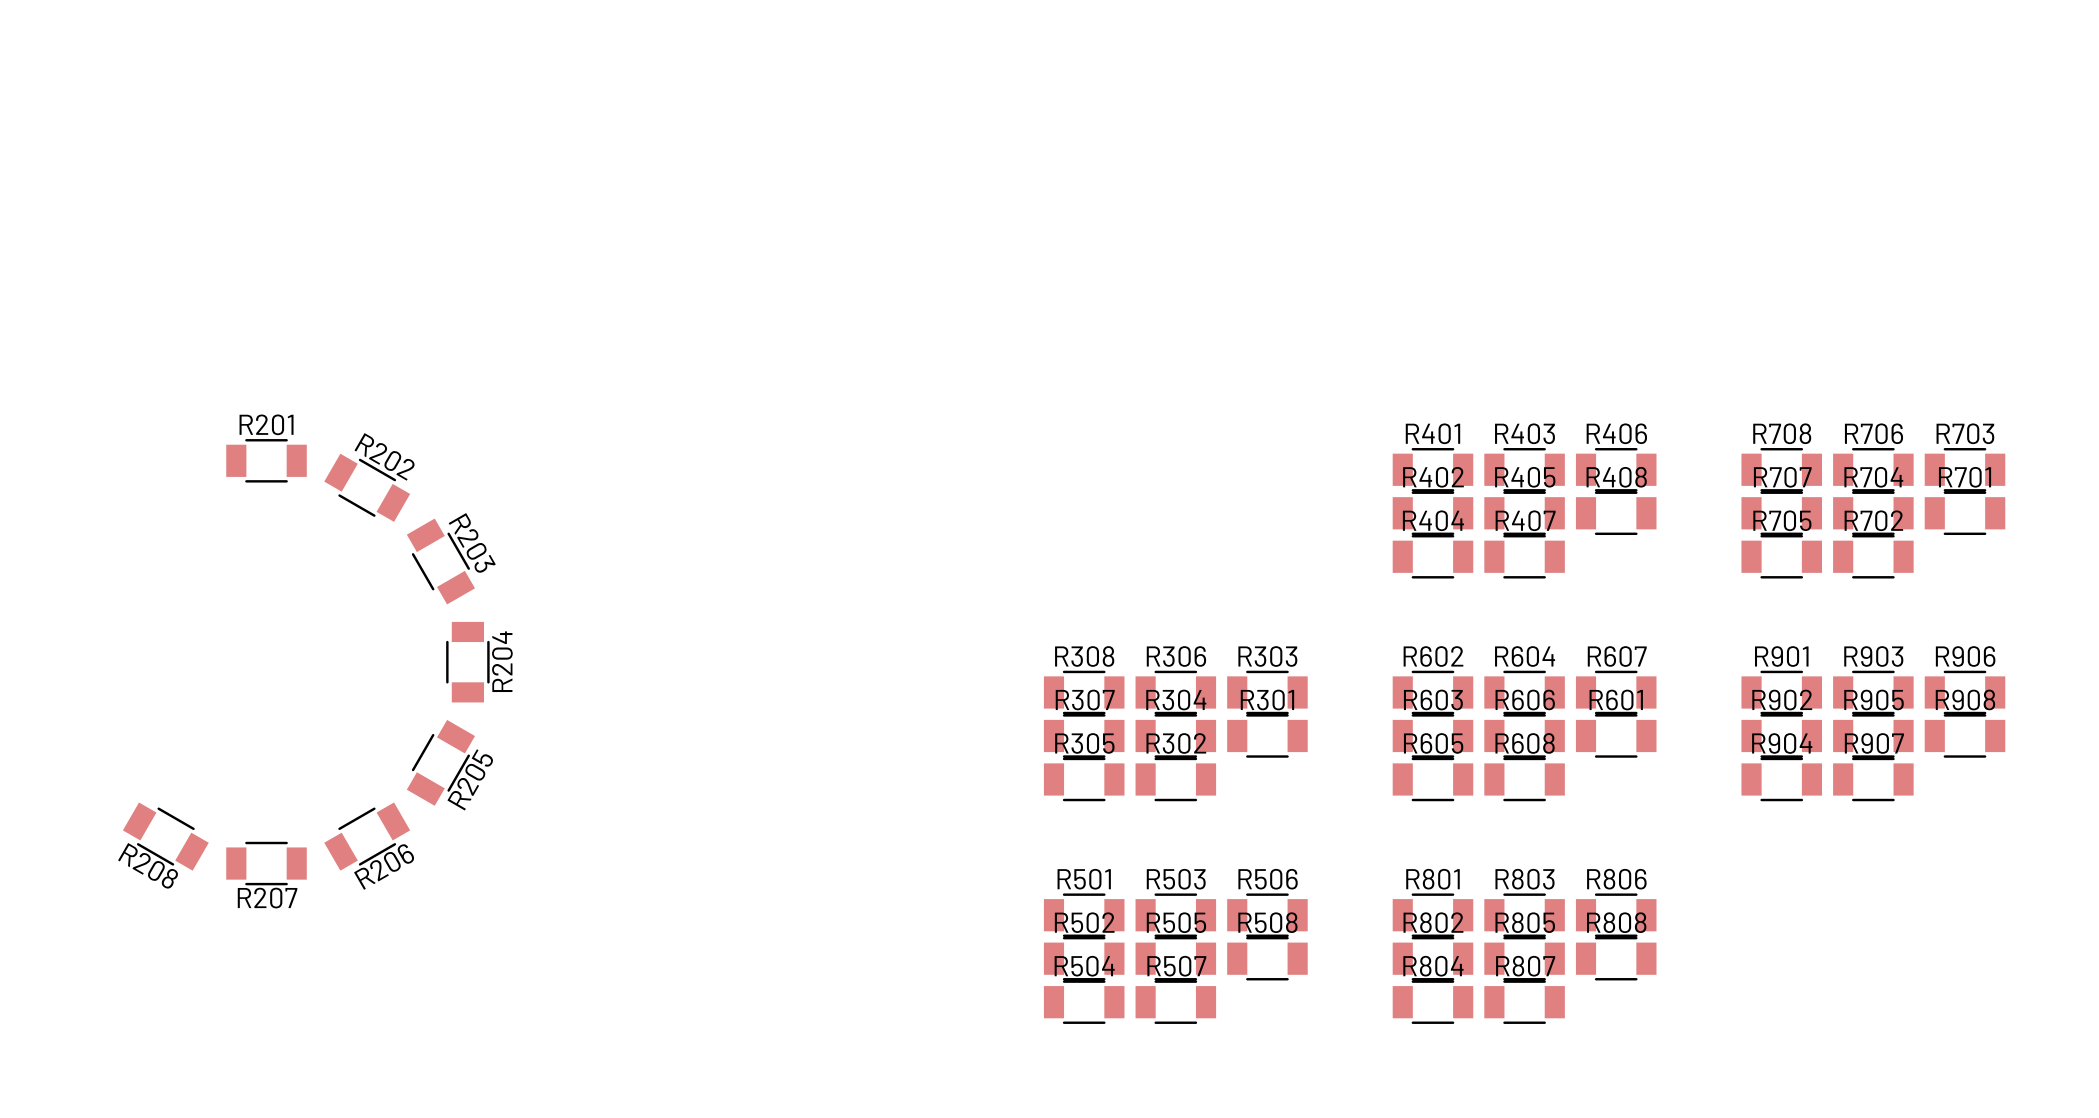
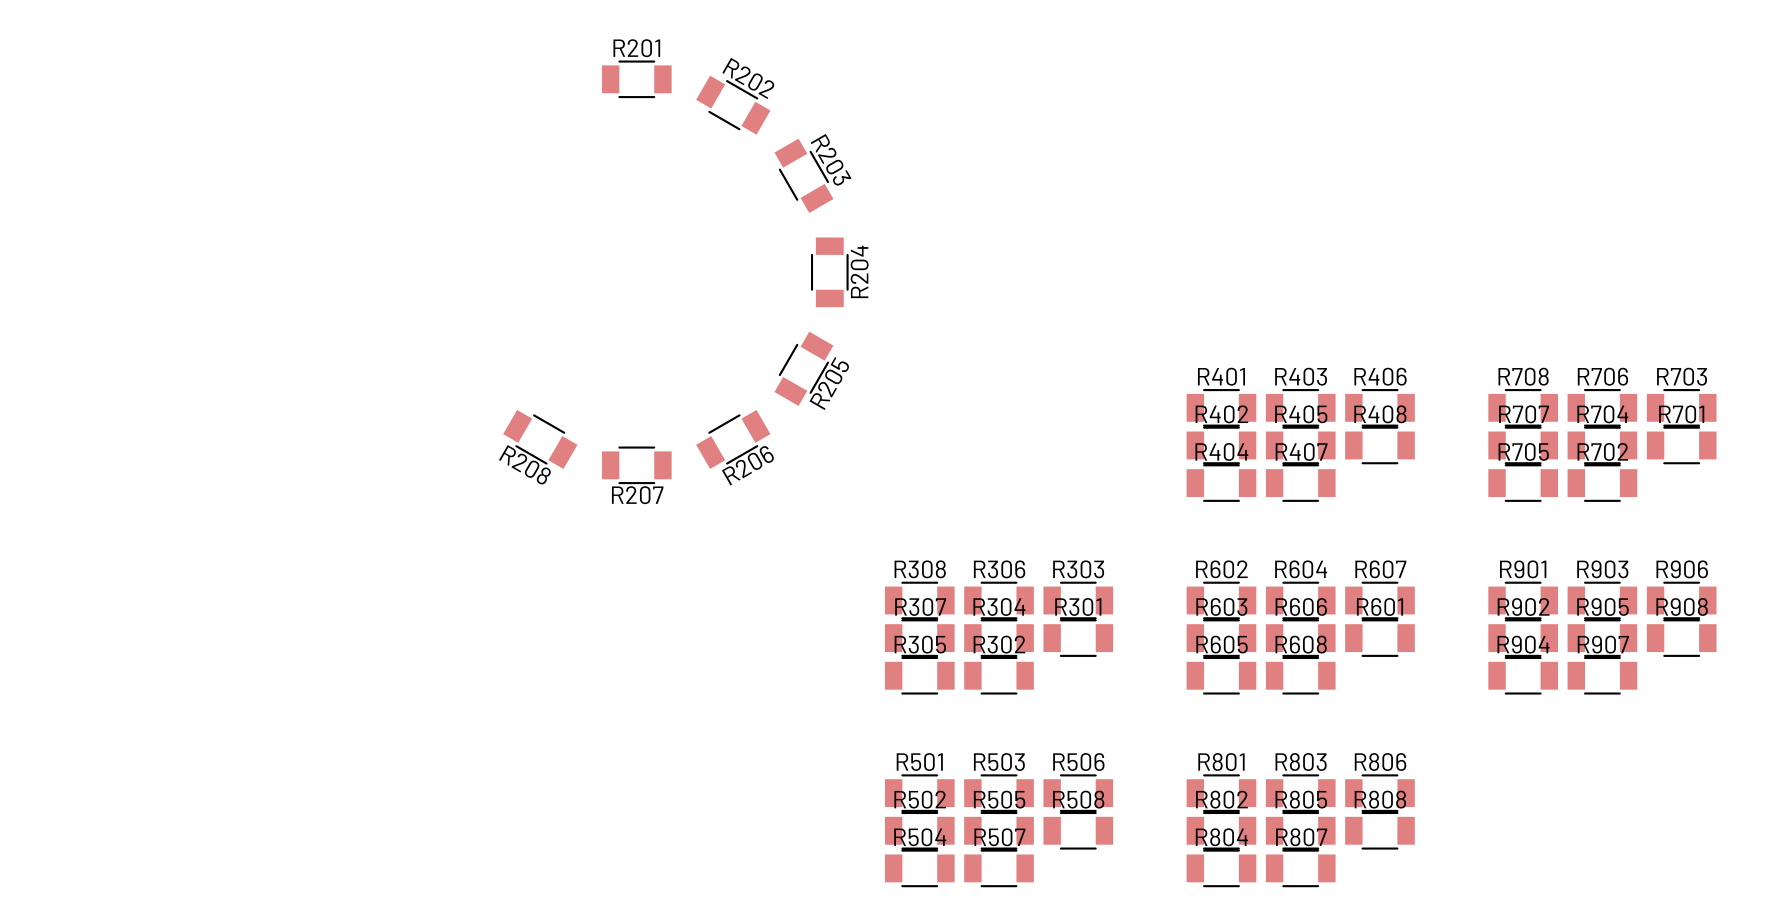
R201 position: (266, 460) -> (636, 79)
R202 position: (367, 487) -> (733, 105)
R203 position: (440, 561) -> (803, 175)
R204 position: (467, 662) -> (829, 272)
R205 position: (440, 762) -> (803, 368)
R208 position: (165, 836) -> (540, 439)
R206 position: (367, 836) -> (733, 439)
R207 position: (266, 863) -> (636, 465)

